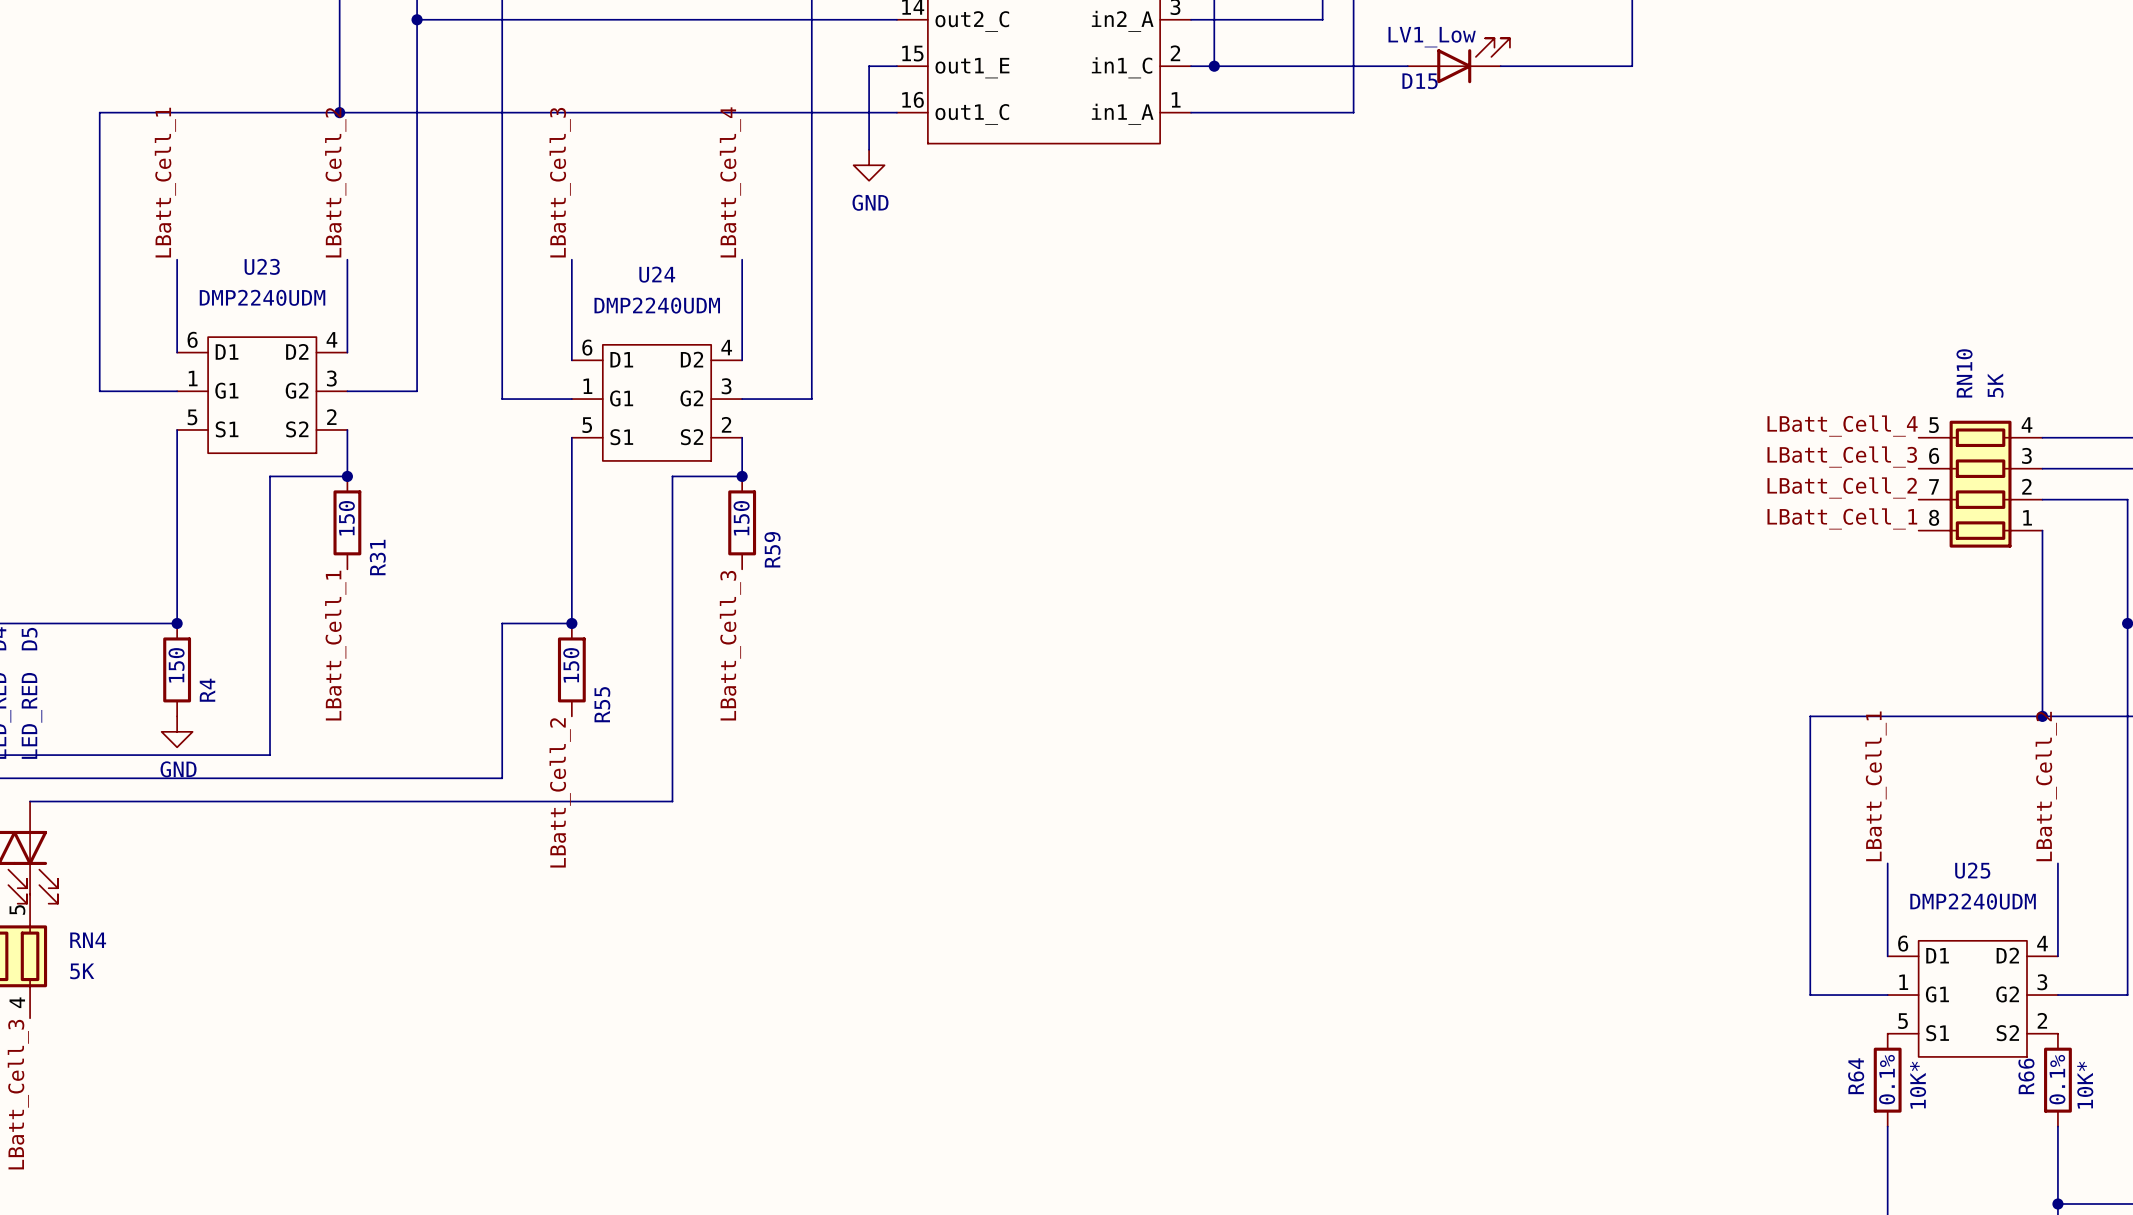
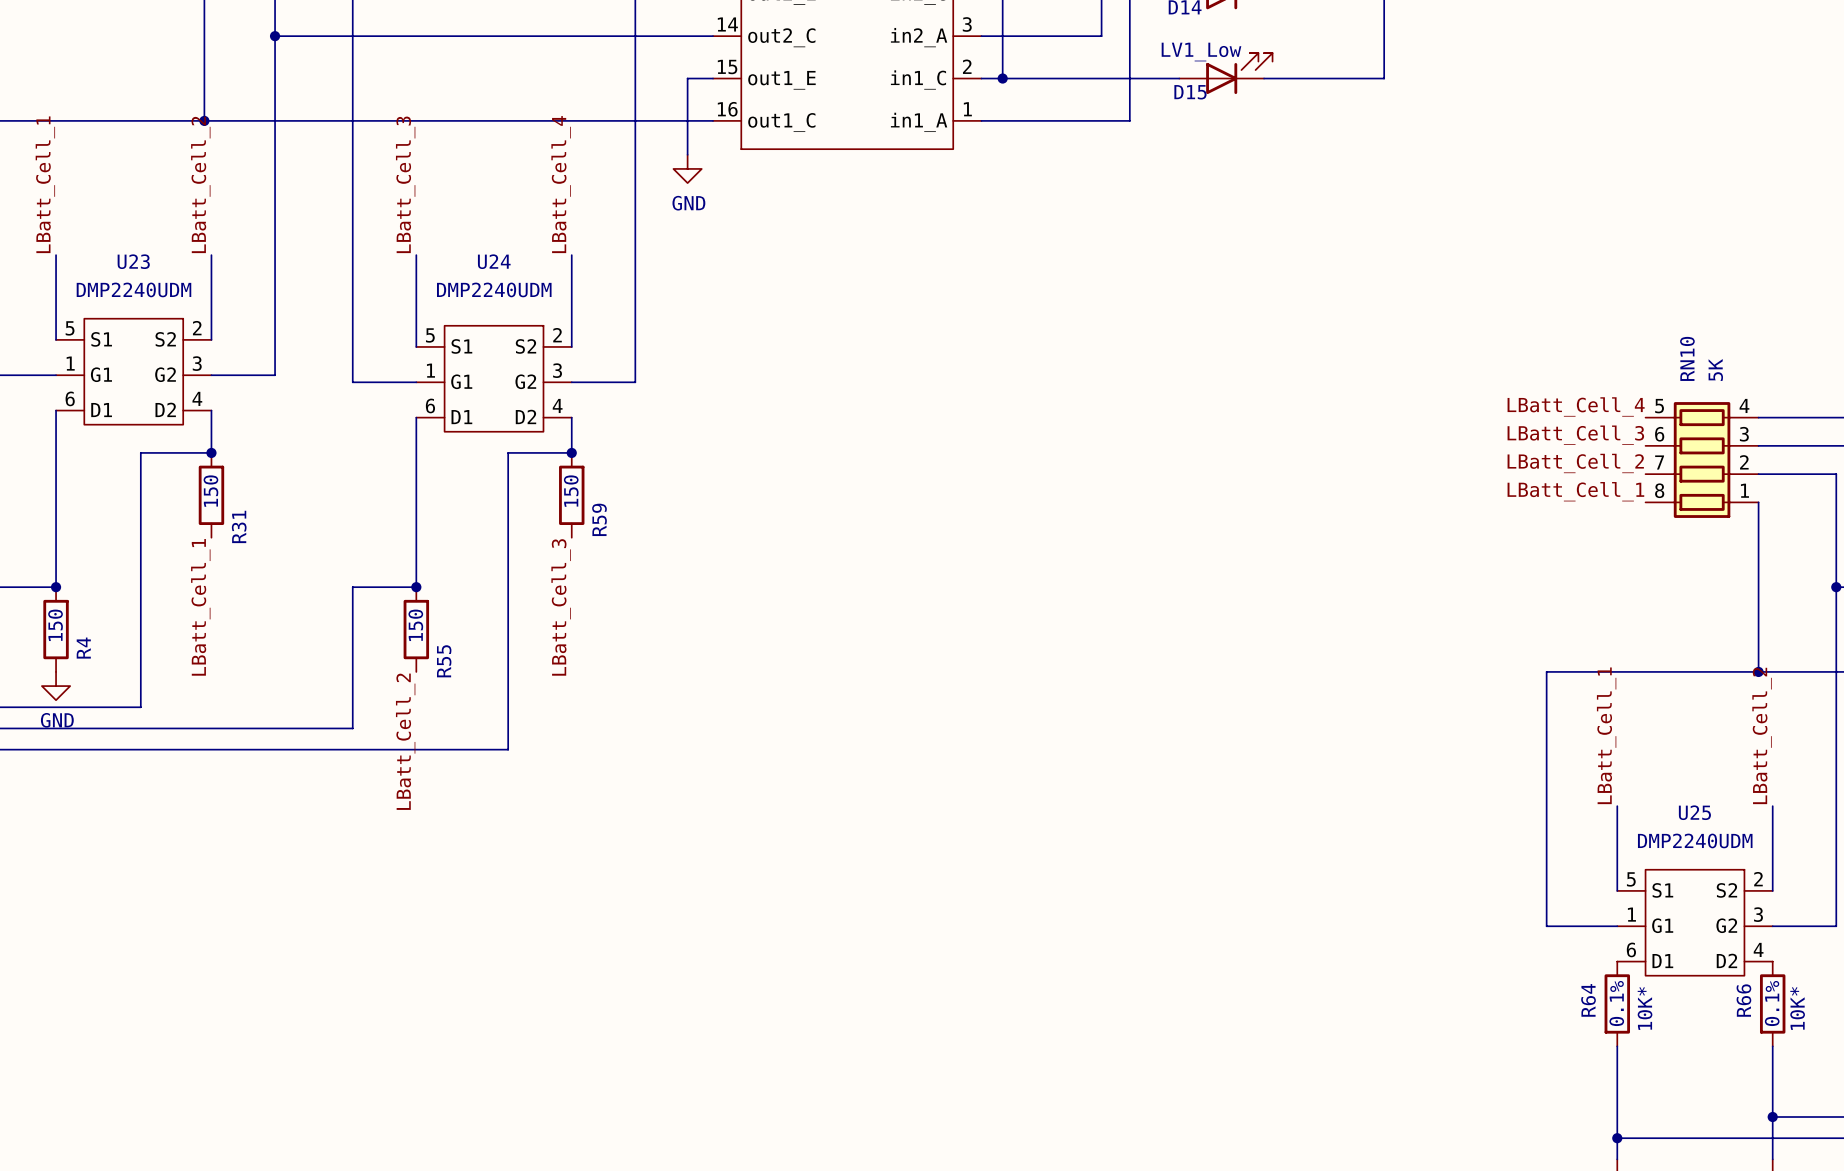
U23 flip: as is (262, 395) -> up-down (133, 371)
U24 flip: as is (657, 402) -> up-down (494, 378)
U25 flip: as is (1972, 998) -> up-down (1694, 922)

